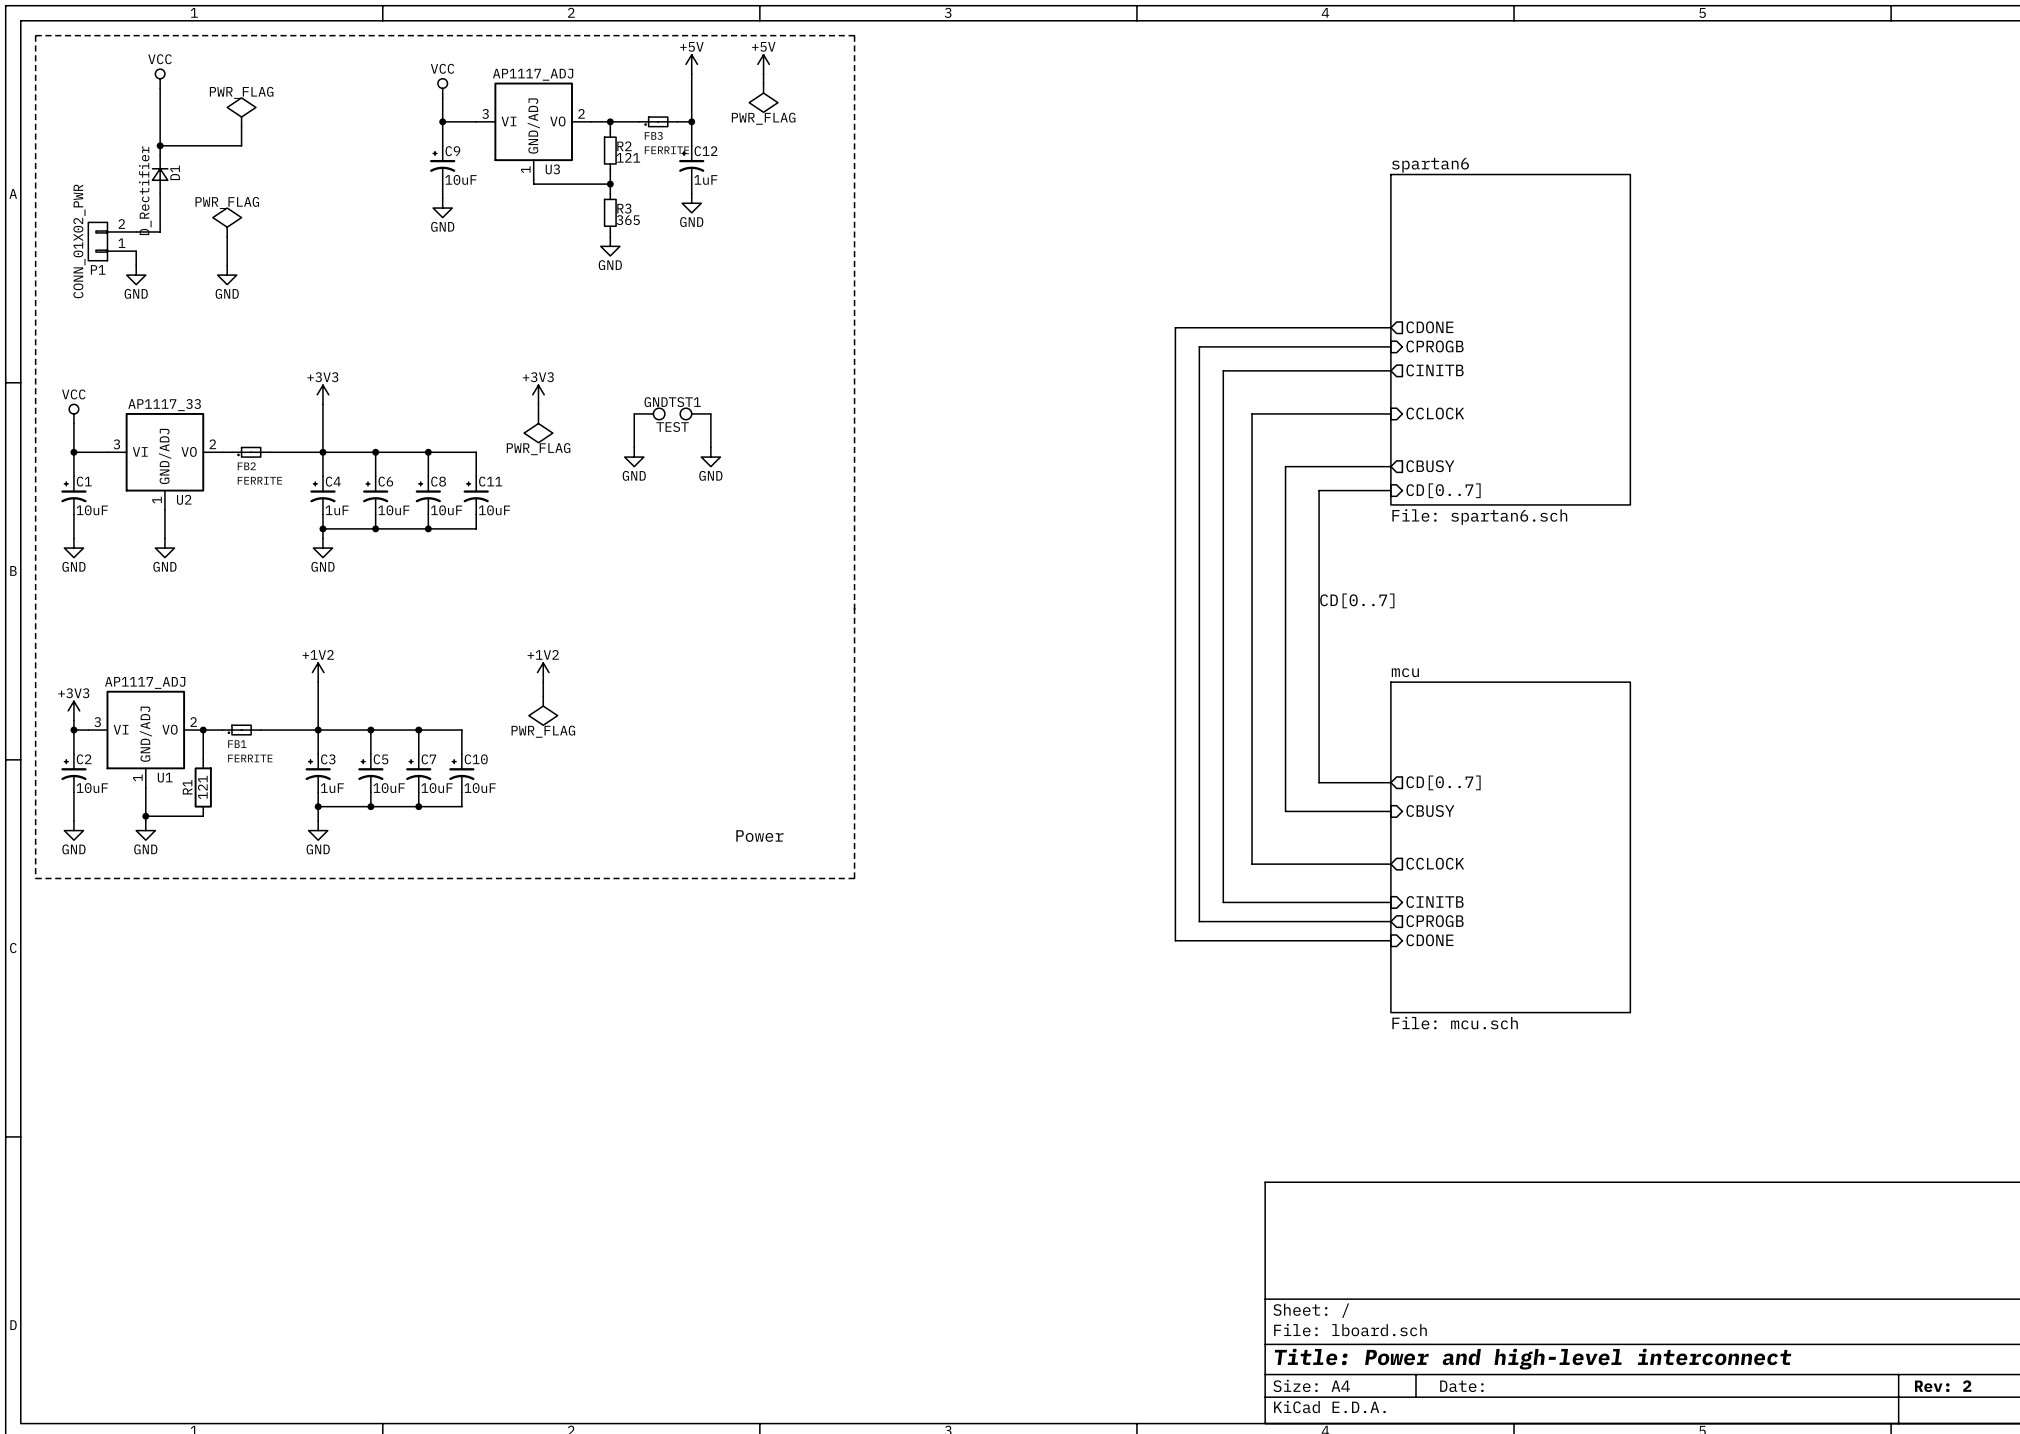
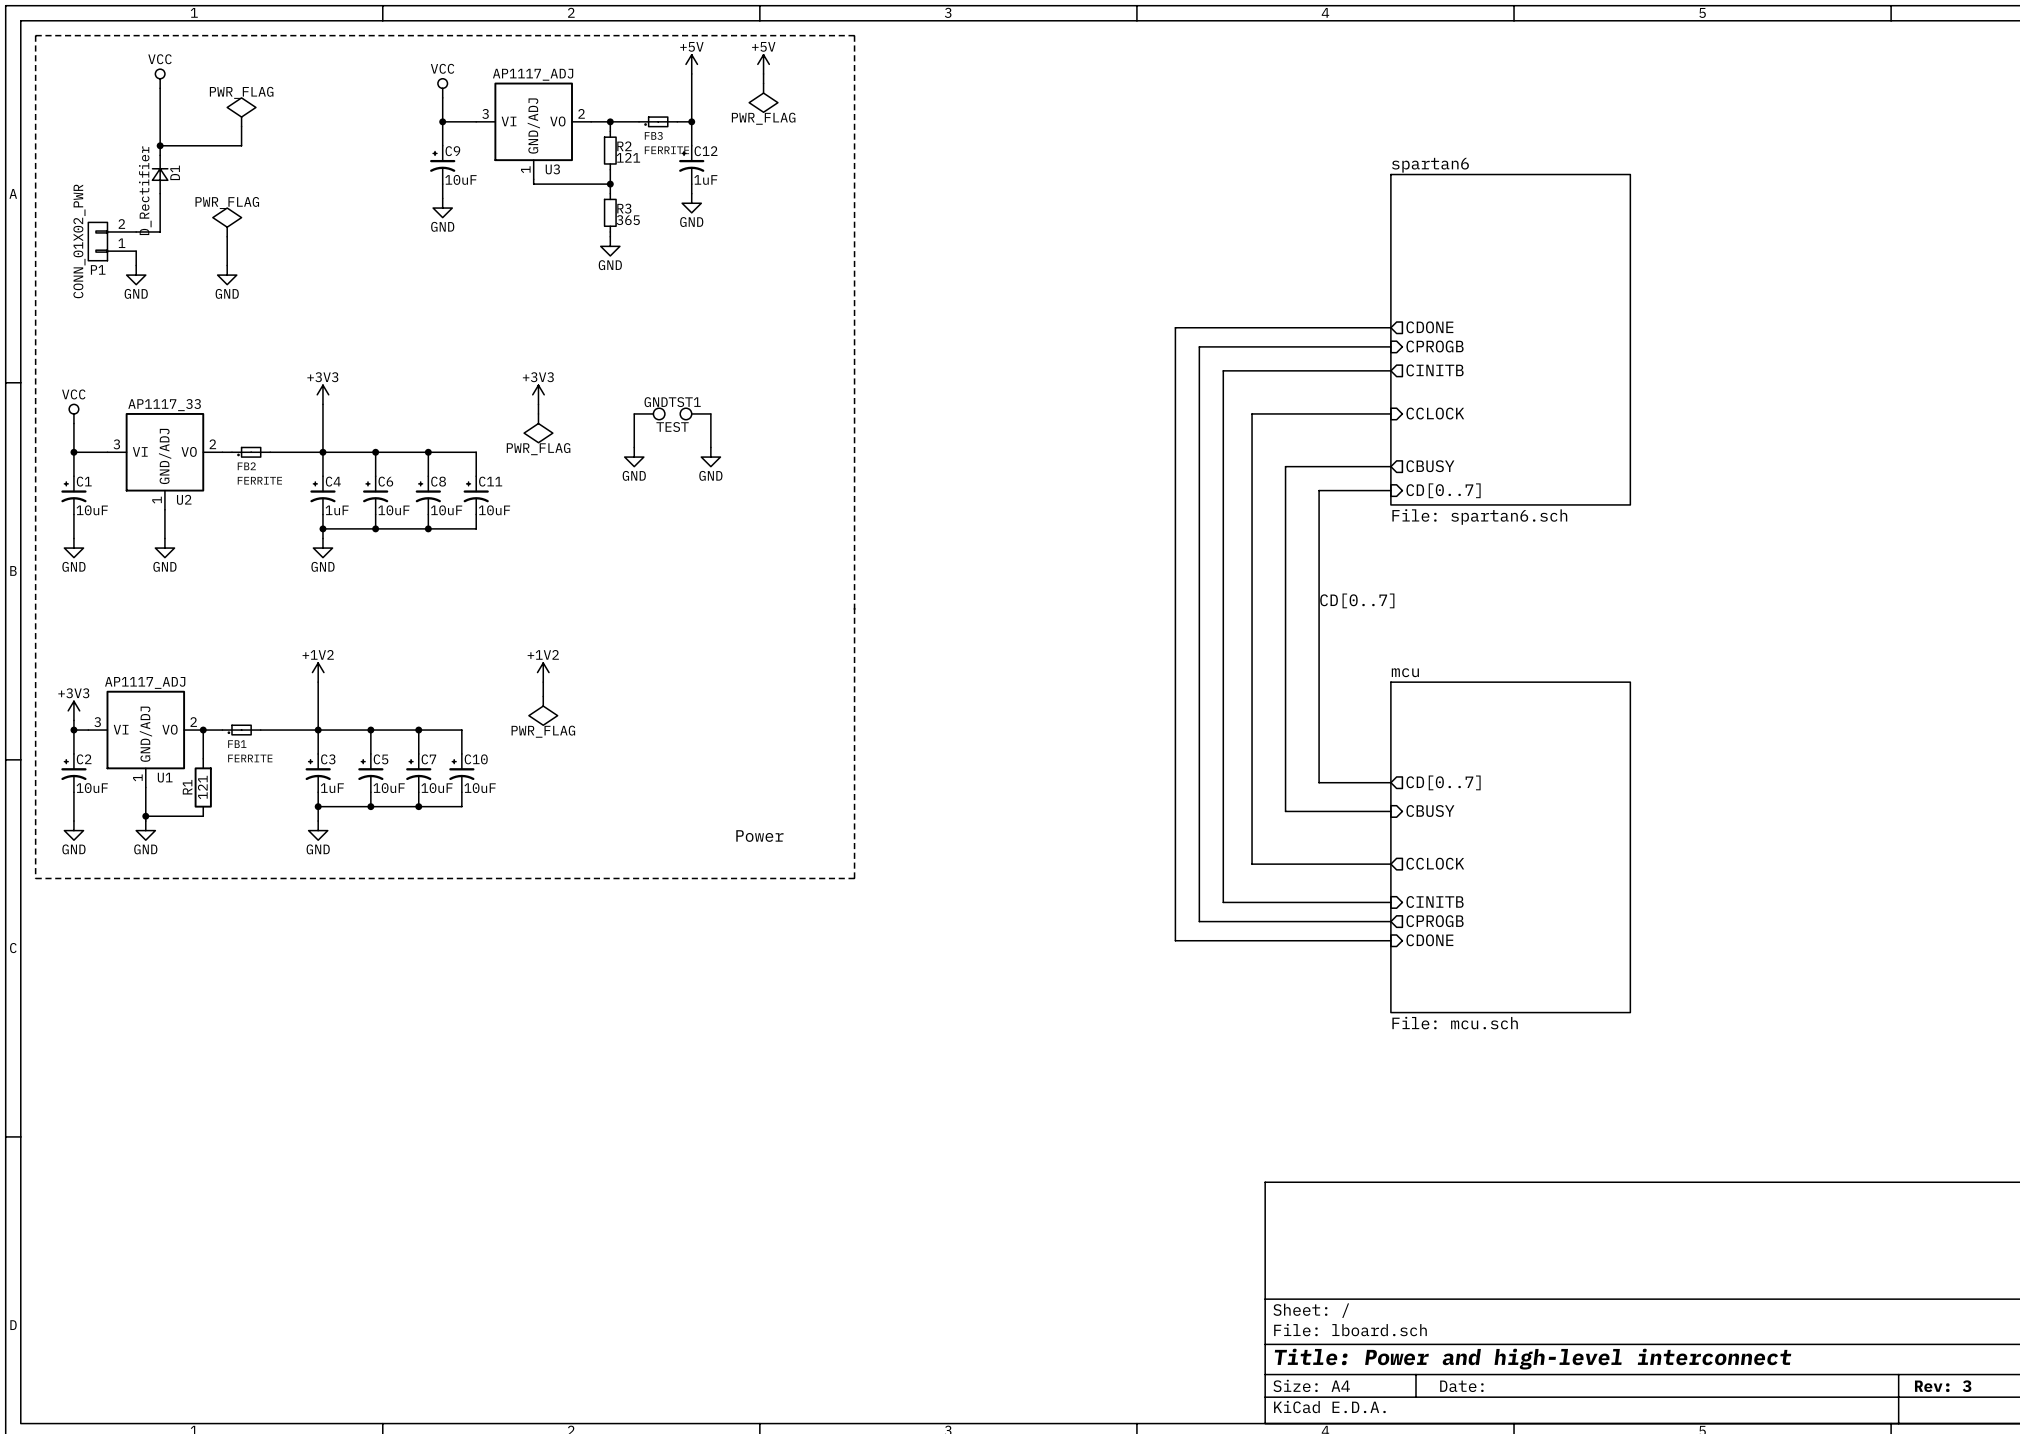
title block: Rev: 2 (1943, 1386) -> Rev: 3 (1943, 1386)

